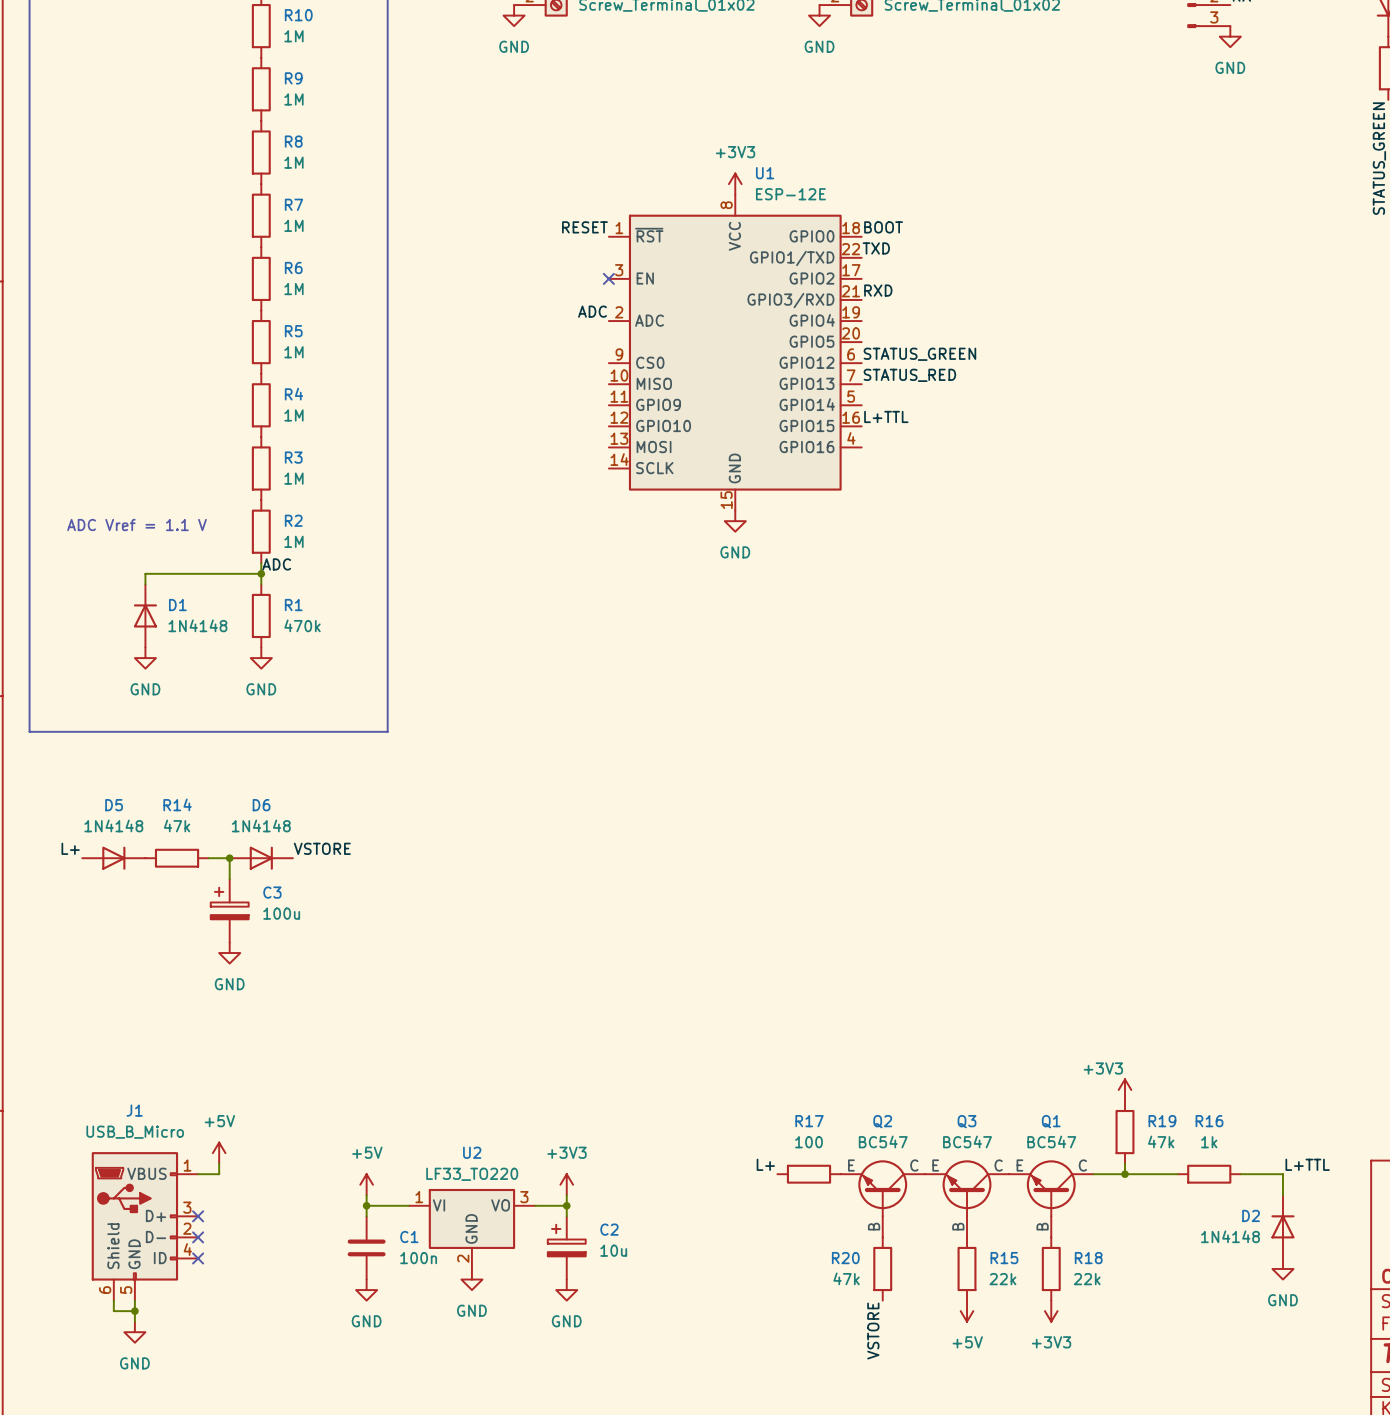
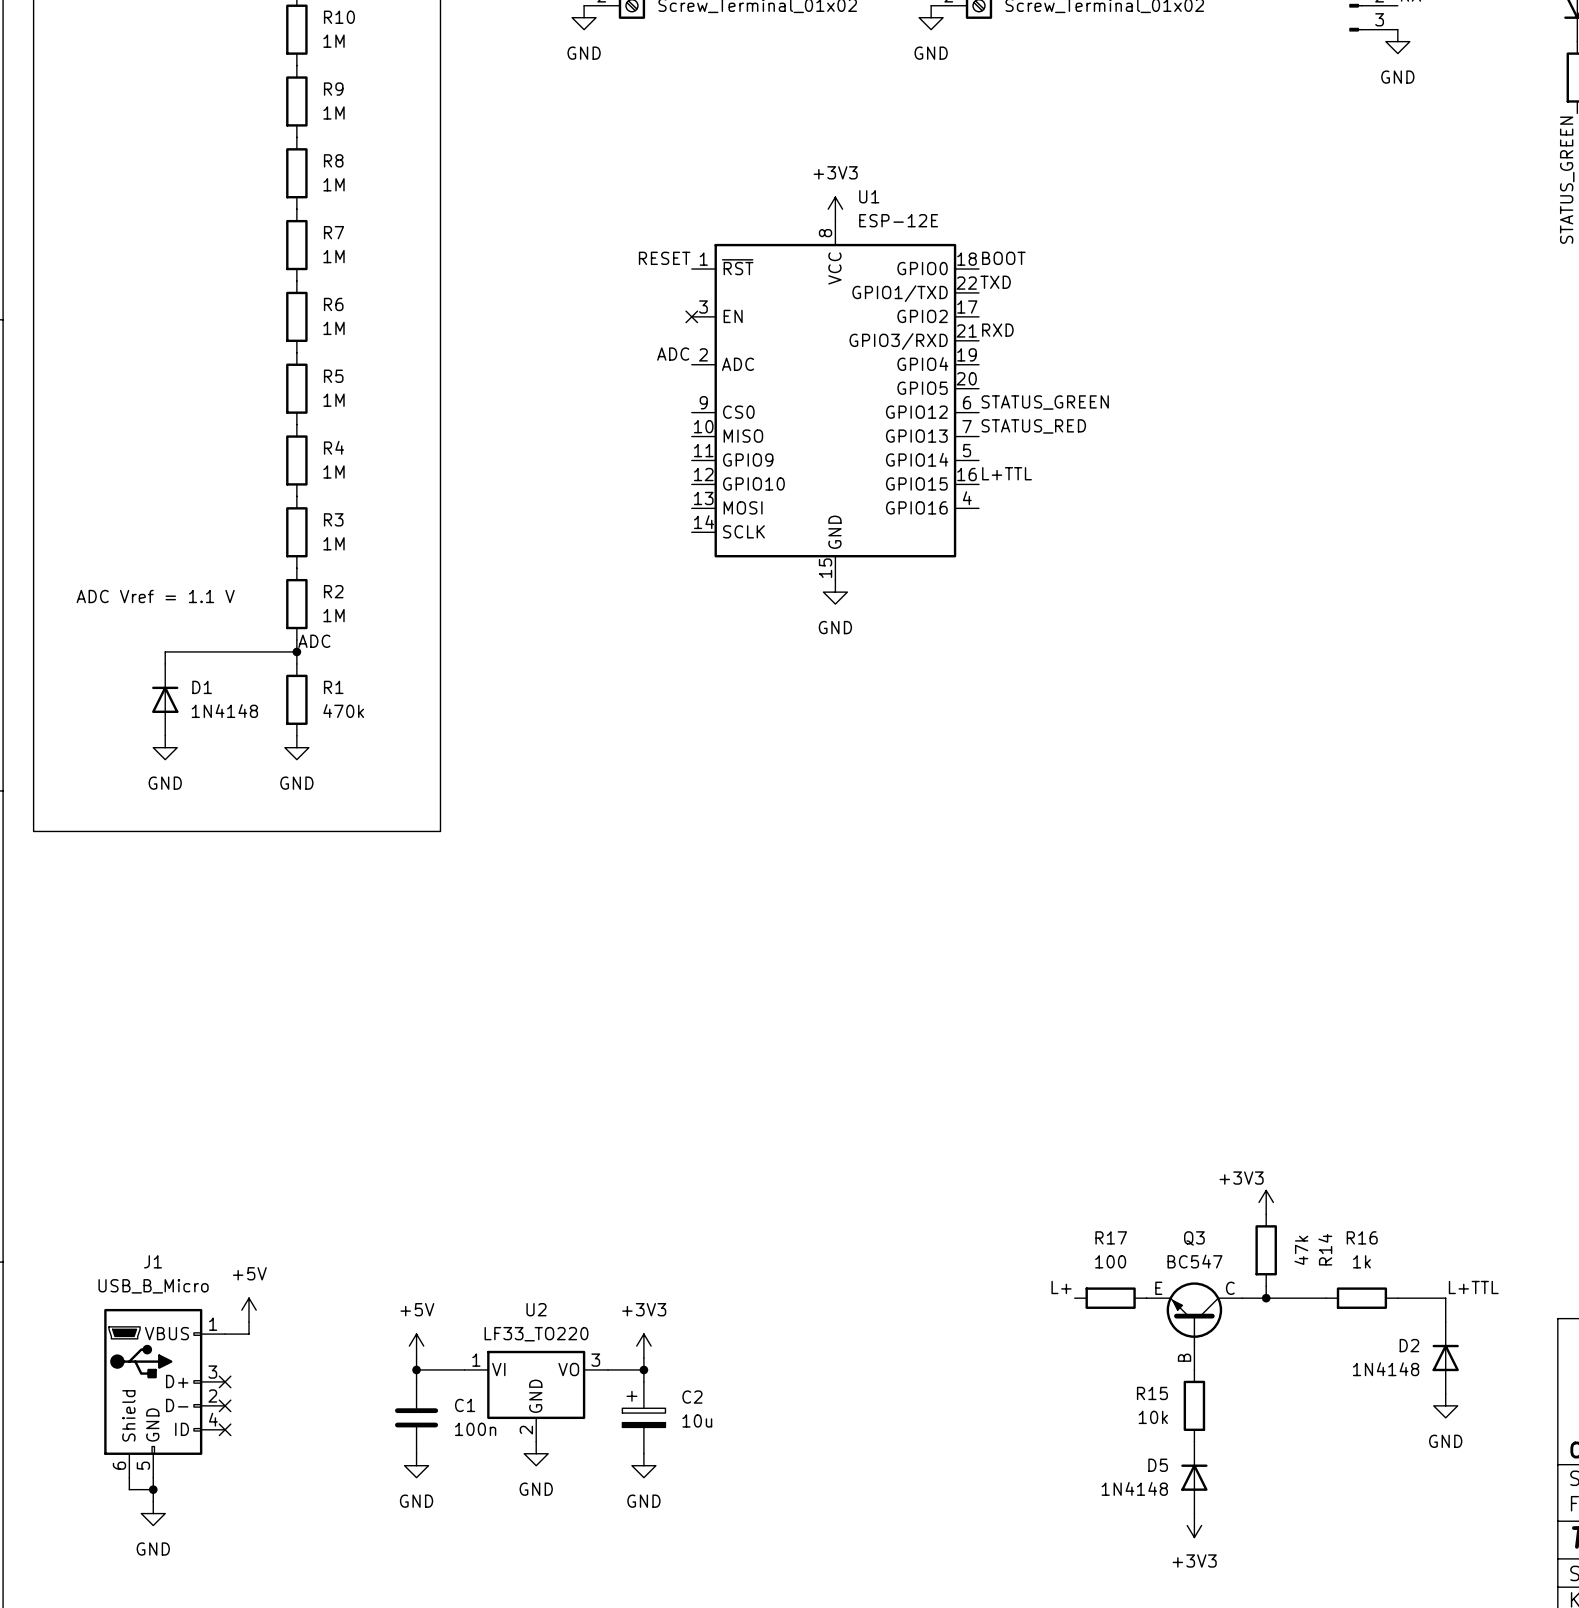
D5 name position: D5 (114, 805) -> D5 (1158, 1465)
D5 value position: 1N4148 (113, 825) -> 1N4148 (1134, 1488)
label: L+ (70, 848) -> none
label: VSTORE (322, 848) -> none
D5 rotation: 0° (113, 858) -> 90° counterclockwise (1194, 1477)
D5 position: (113, 858) -> (1194, 1477)
R14 rotation: 0° (177, 858) -> 90° clockwise (1266, 1250)
R14 position: (177, 858) -> (1266, 1250)
wire: (208, 858) (229, 858) (229, 879) -> none
junction: (229, 858) -> none
D6: 1N4148 (261, 858) -> none
C3: 100u (229, 910) -> none
power symbol: GND (229, 953) -> none
power symbol position: +3V3 (1124, 1089) -> +3V3 (1266, 1202)
R19: 47k (1124, 1132) -> none
wire: none -> (1242, 1298) (1326, 1298)
wire: (1124, 1163) (1124, 1174) -> (1266, 1286) (1266, 1298)
label position: L+ (765, 1164) -> L+ (1061, 1287)
label position: L+TTL (1307, 1164) -> L+TTL (1473, 1287)
R17 position: (809, 1174) -> (1110, 1298)
wire: (1093, 1174) (1177, 1174) -> none
junction position: (1124, 1174) -> (1266, 1298)
R16 position: (1209, 1174) -> (1361, 1298)
wire: (1240, 1174) (1282, 1174) (1282, 1195) -> (1397, 1298) (1445, 1298) (1445, 1322)
Q2: BC547 (882, 1198) -> none
Q3 position: (967, 1198) -> (1194, 1326)
Q1: BC547 (1051, 1198) -> none
D2 position: (1282, 1226) -> (1445, 1358)
R15 name position: R15 (1004, 1258) -> R15 (1152, 1393)
R20: 47k (882, 1268) -> none
R15 position: (967, 1268) -> (1194, 1405)
R18: 22k (1051, 1268) -> none
power symbol position: GND (1282, 1268) -> GND (1445, 1405)
R15 value: 22k (1002, 1279) -> 10k (1153, 1417)
power symbol: +5V (967, 1311) -> none
power symbol position: +3V3 (1051, 1311) -> +3V3 (1194, 1525)
label: VSTORE (873, 1331) -> none

